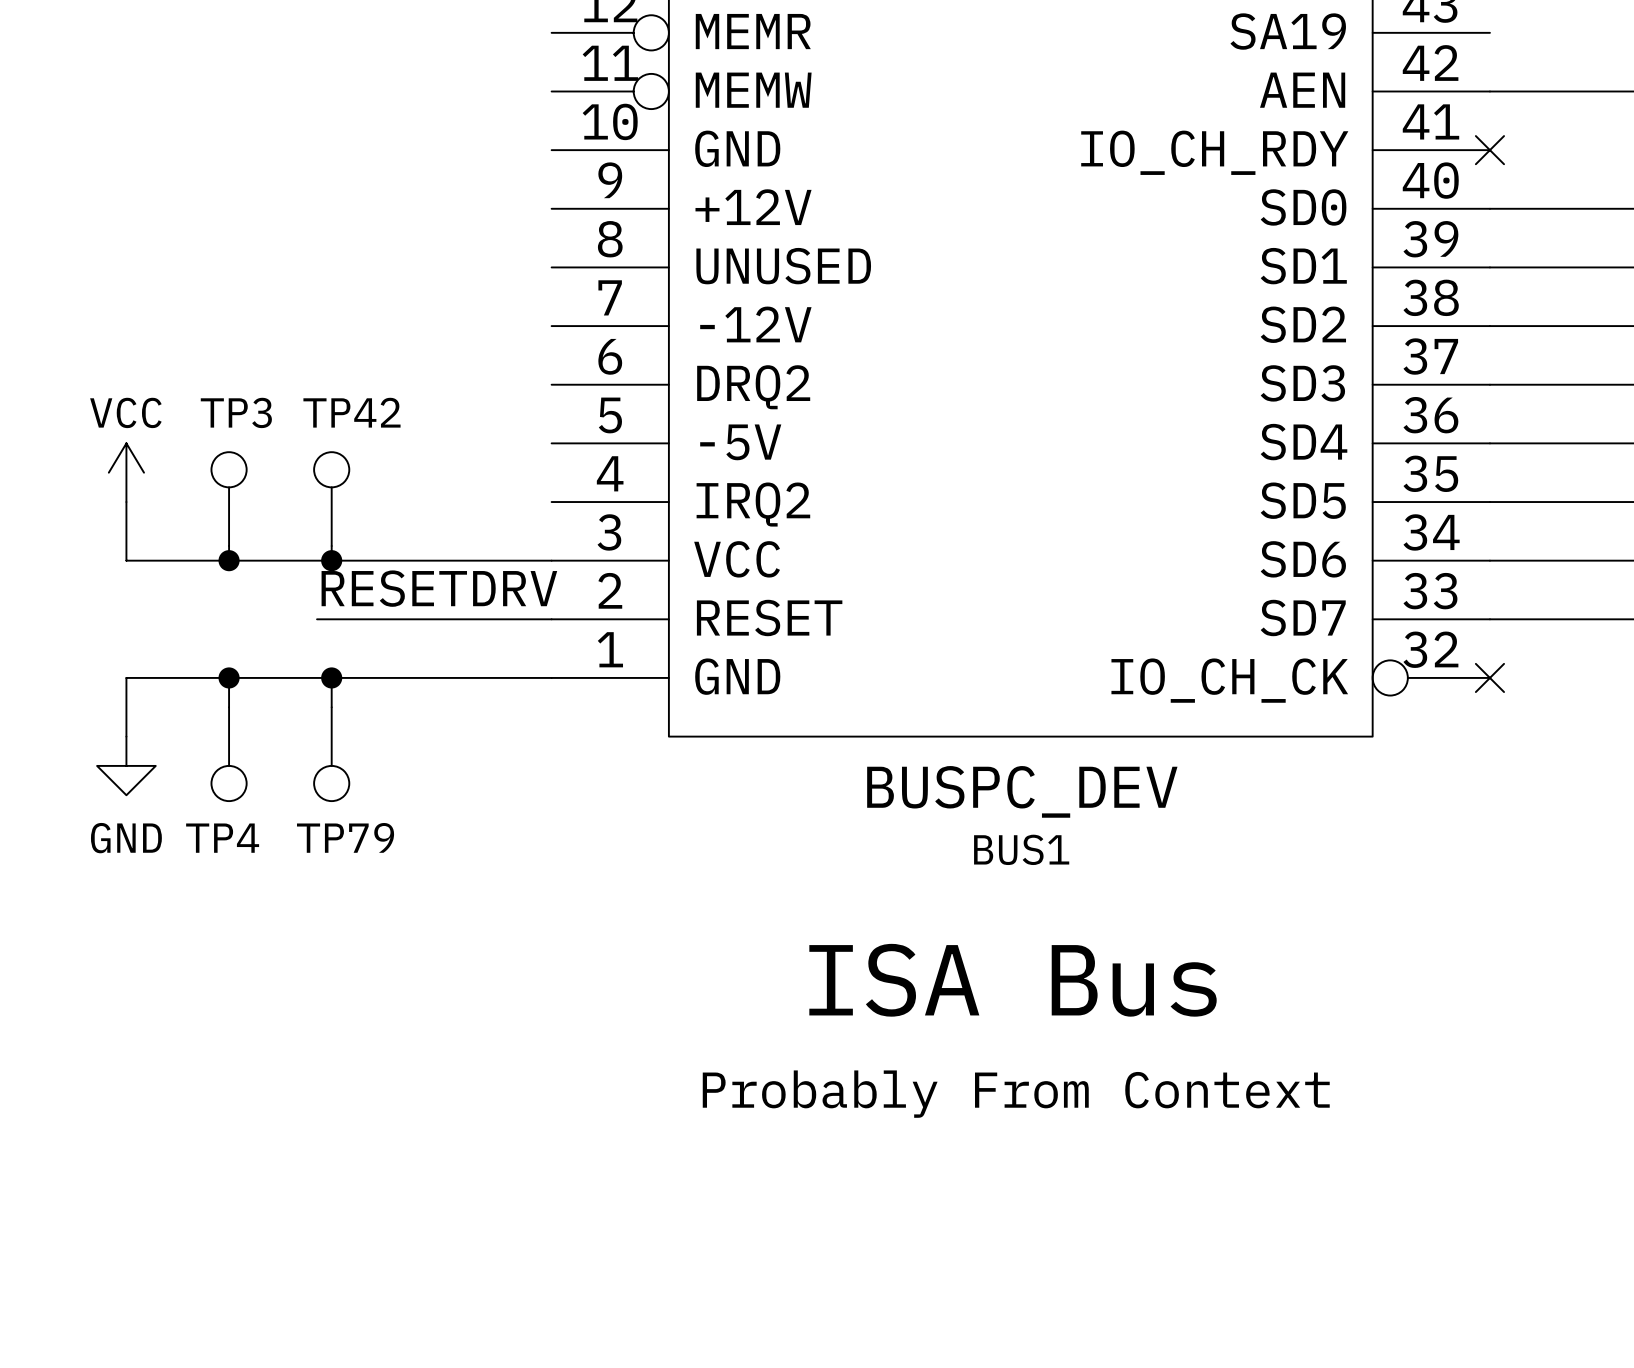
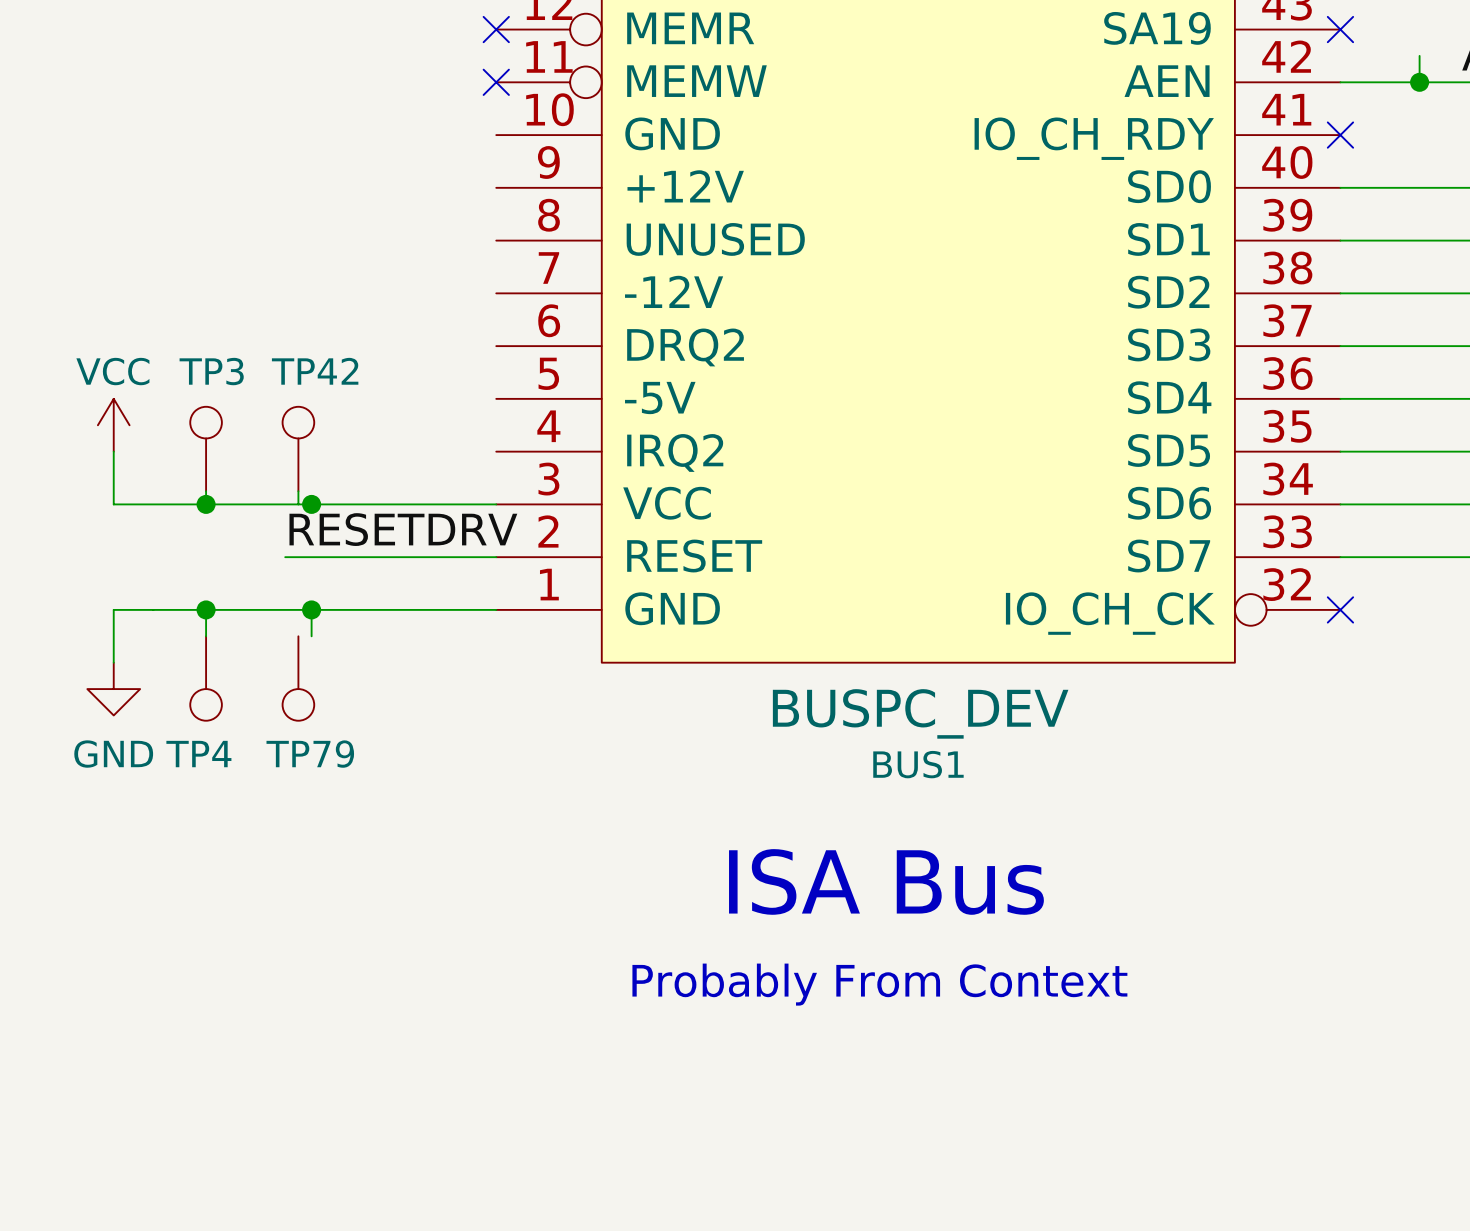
no-connect mark: none -> (496, 29)
no-connect mark: none -> (1340, 29)
wire: none -> (1419, 55) (1419, 82)
no-connect mark: none -> (496, 82)
junction: none -> (1419, 82)
junction position: (331, 560) -> (311, 504)
wire: (331, 677) (331, 707) -> (311, 609) (311, 636)
junction position: (331, 677) -> (311, 609)

